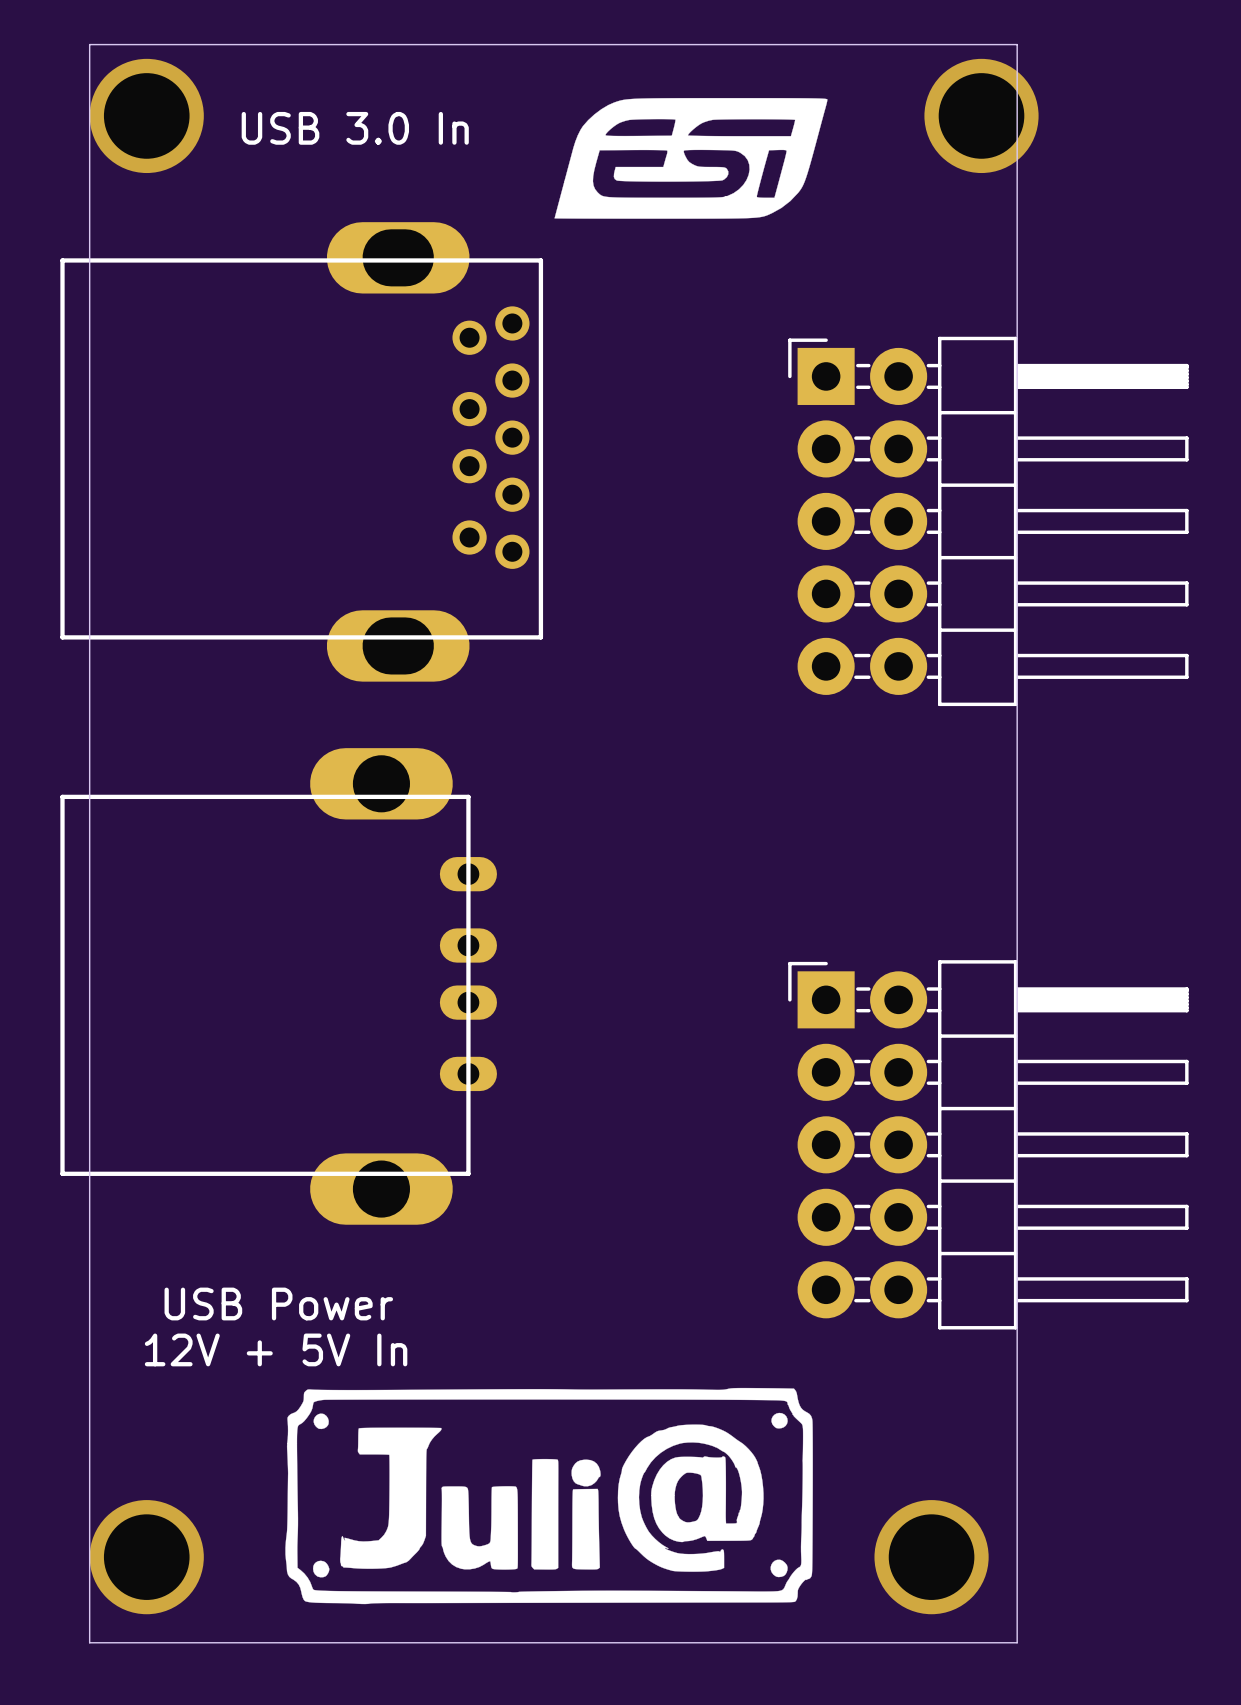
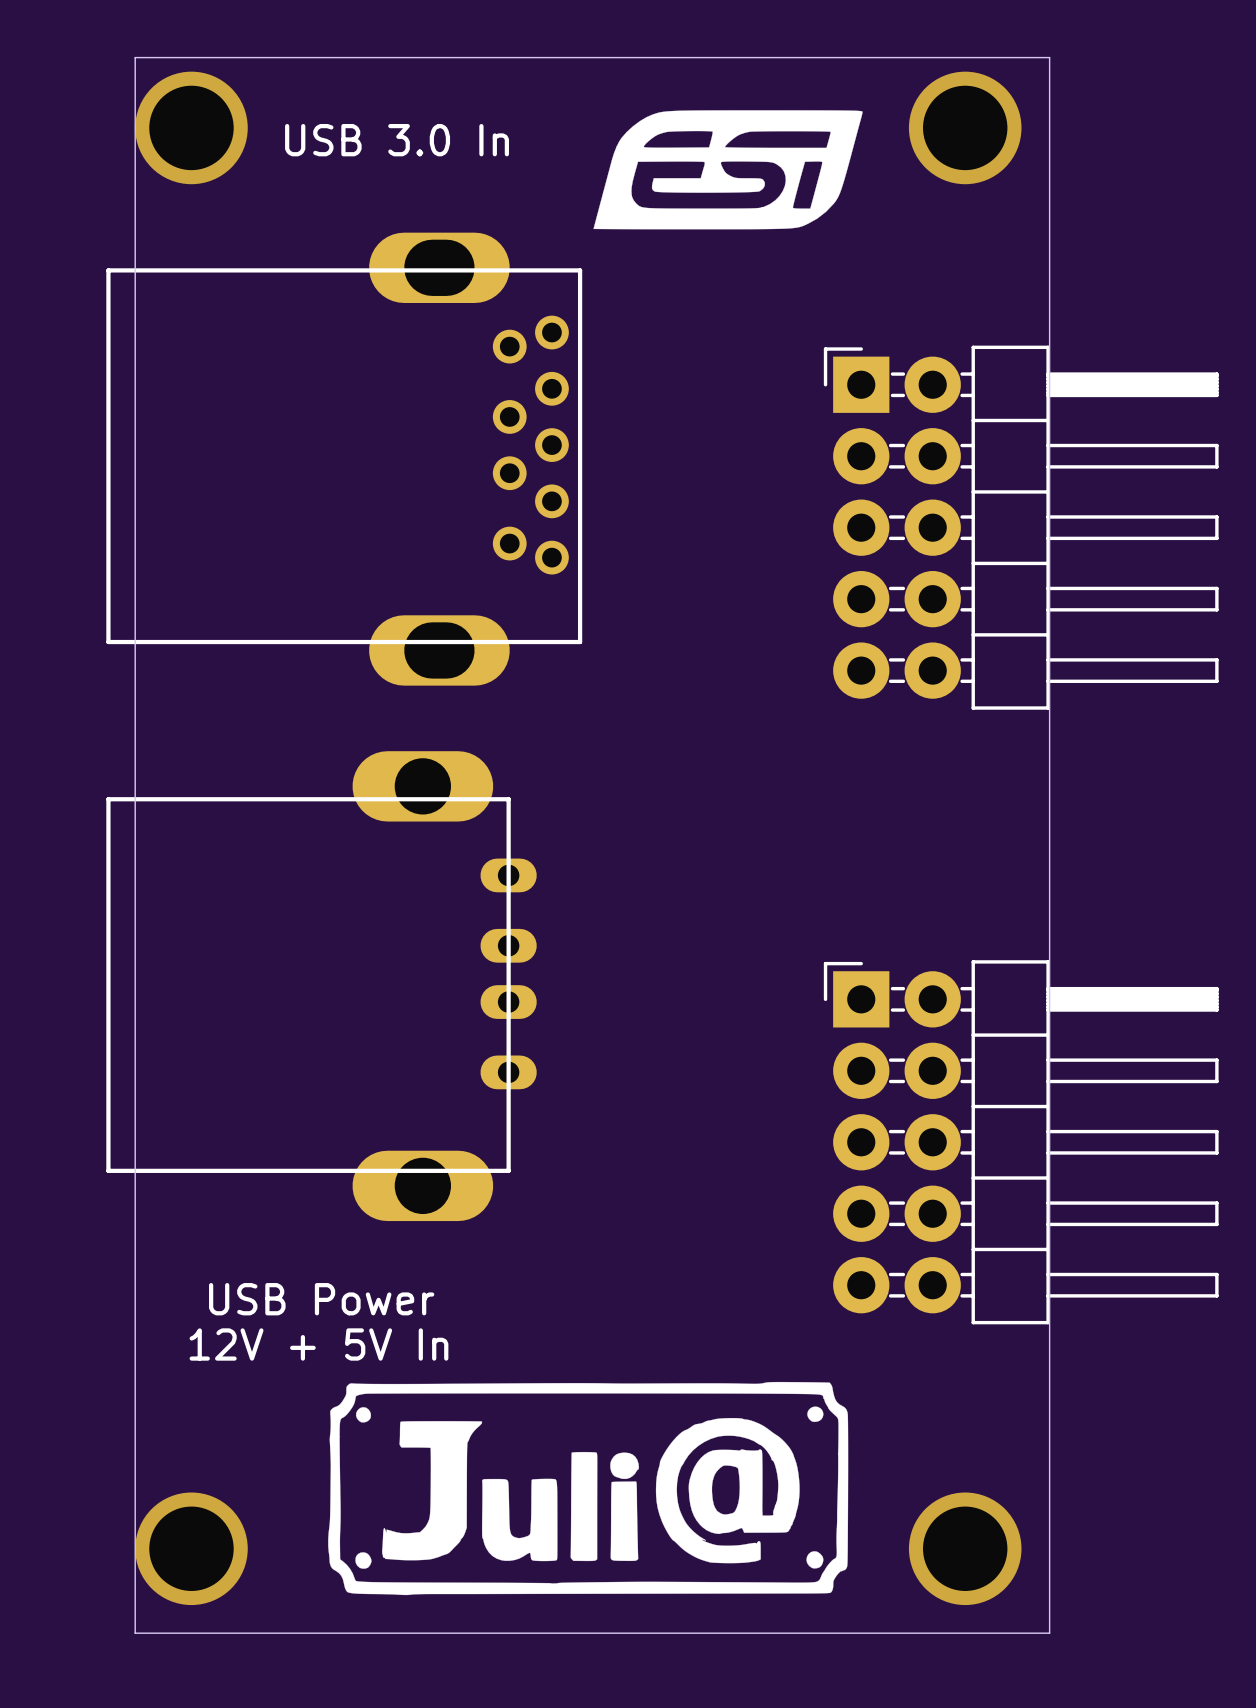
via position: (981, 115) -> (965, 127)

